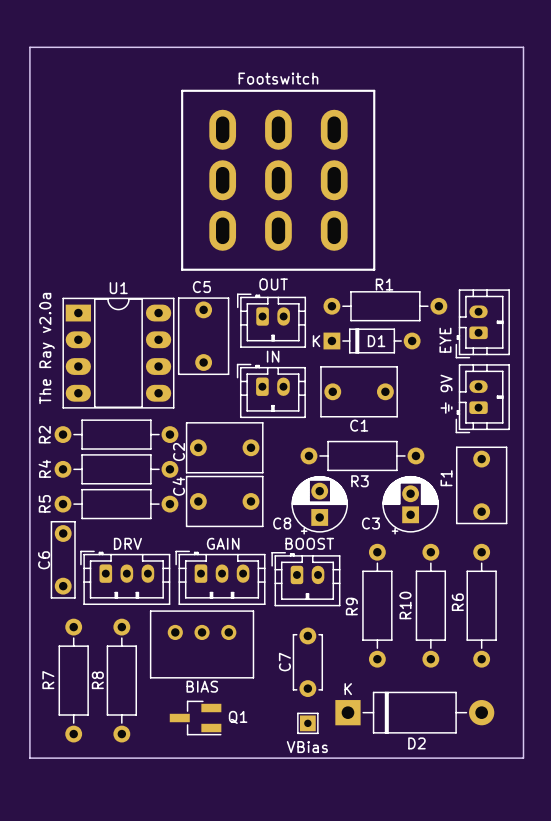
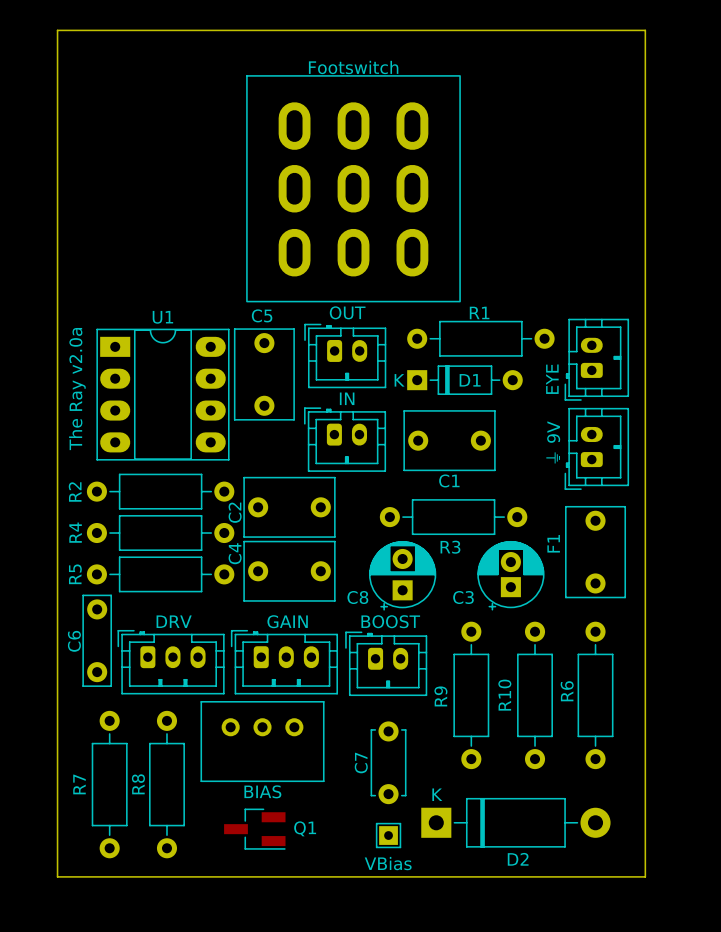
part footprint: [181, 89, 376, 271] -> [246, 75, 461, 303]

